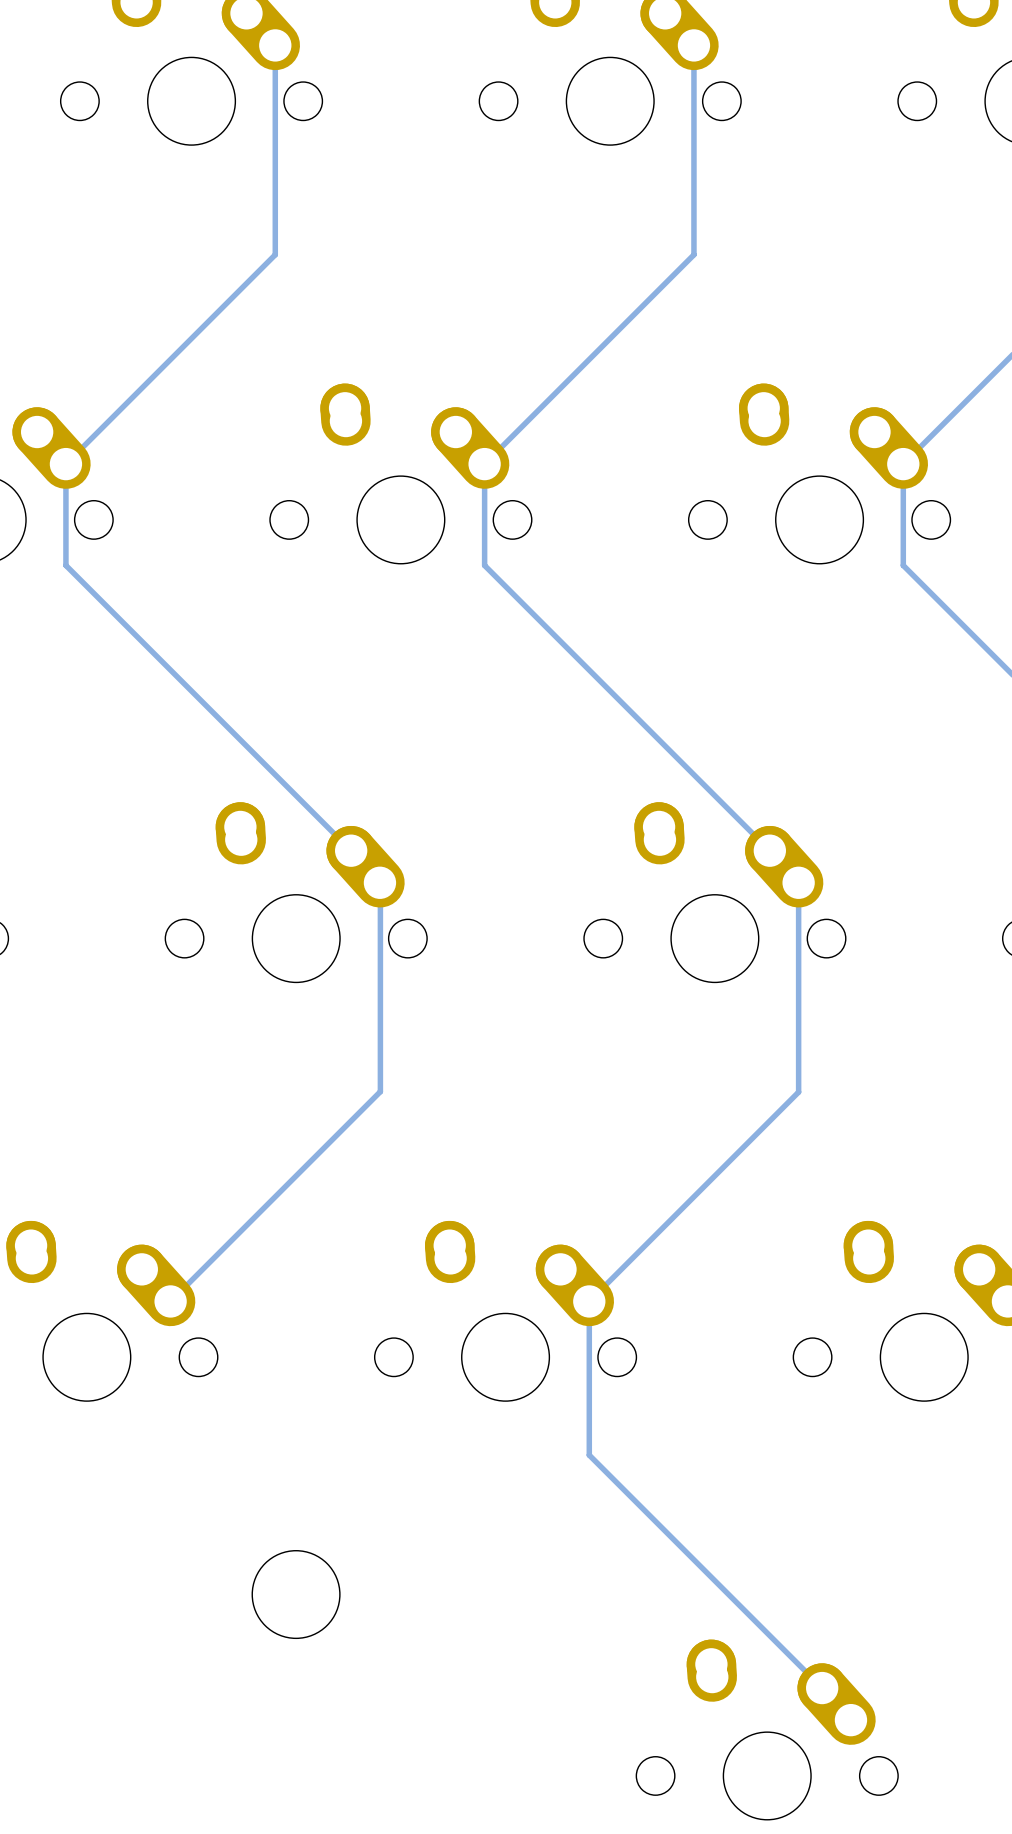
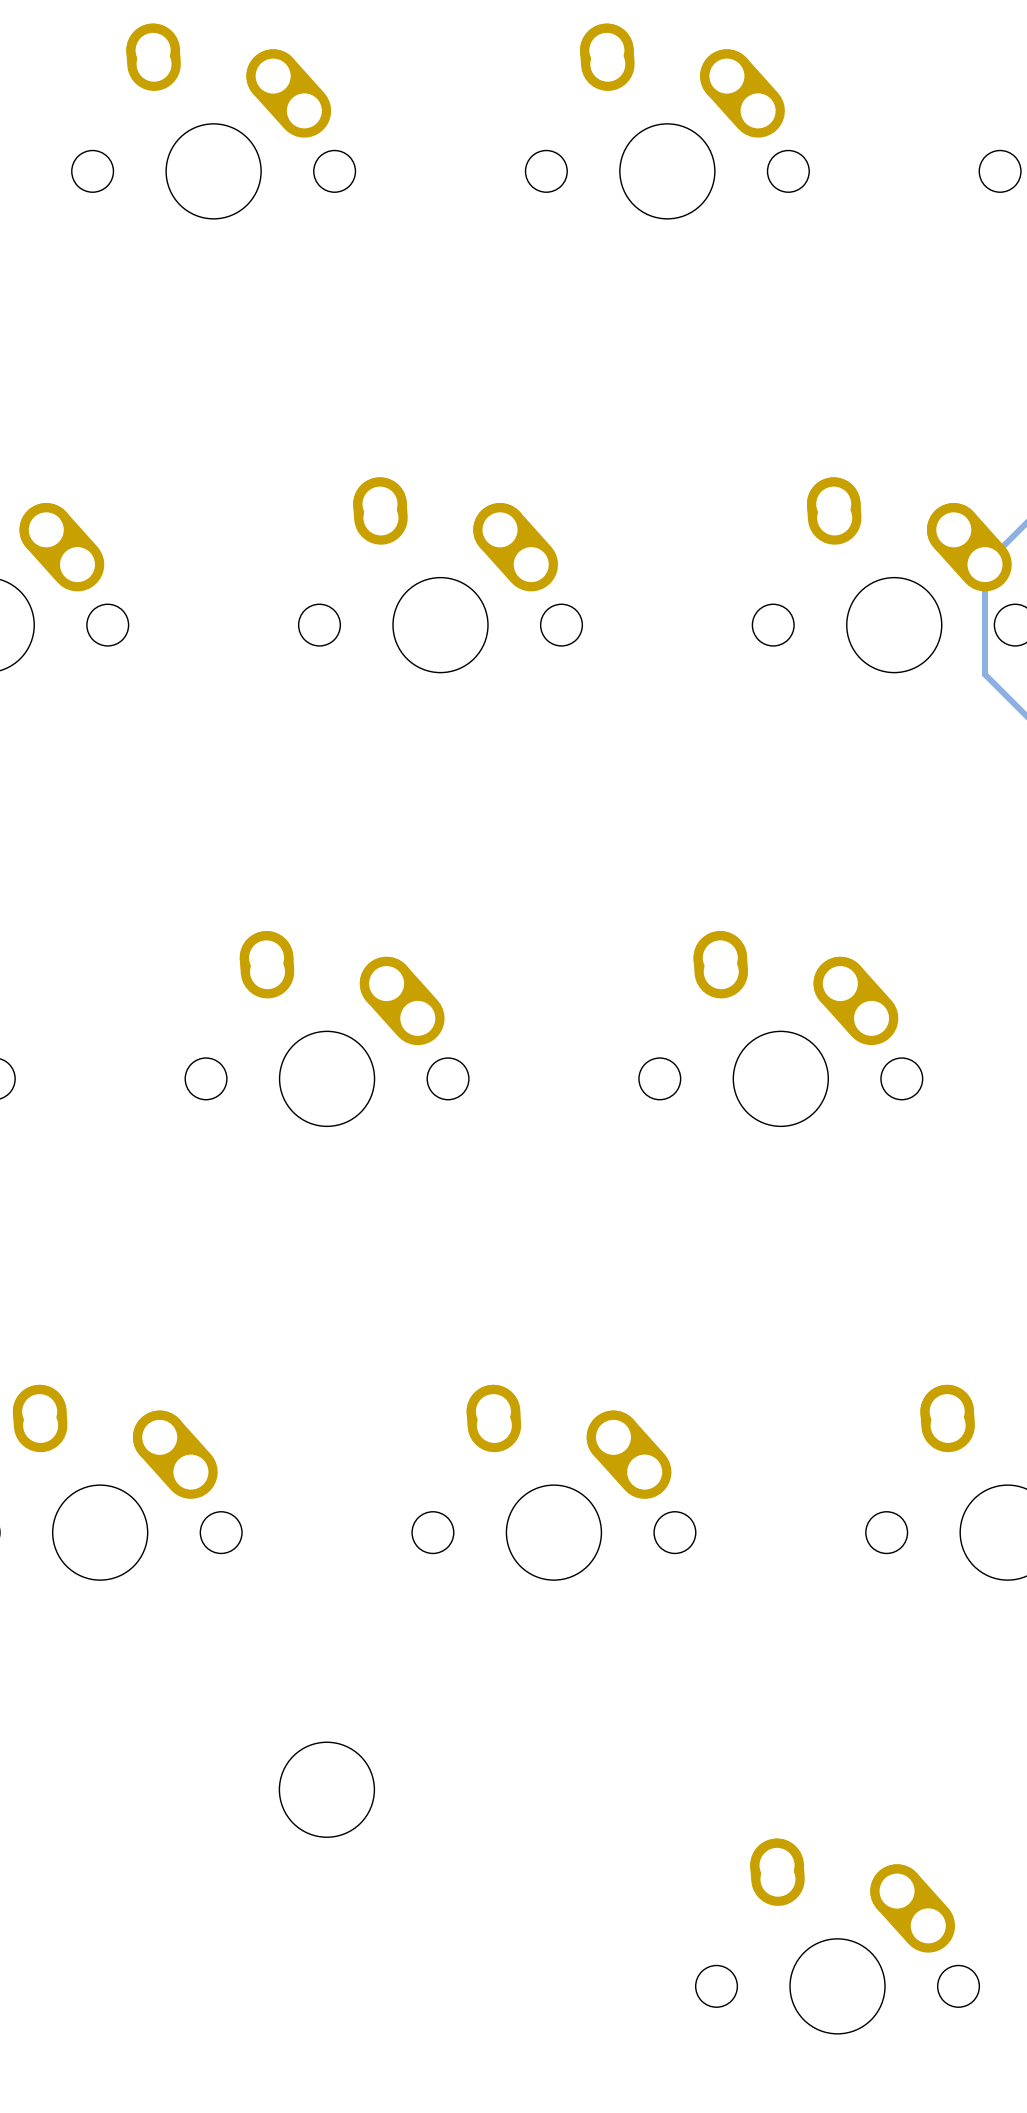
track: (275, 45) (275, 254) (65, 464) (65, 565) (351, 850) -> none
track: (693, 45) (693, 254) (484, 464) (484, 565) (769, 850) -> none
track: (379, 882) (380, 1091) (170, 1301) -> none
track: (798, 882) (798, 1092) (589, 1301) (589, 1455) (822, 1688) -> none

